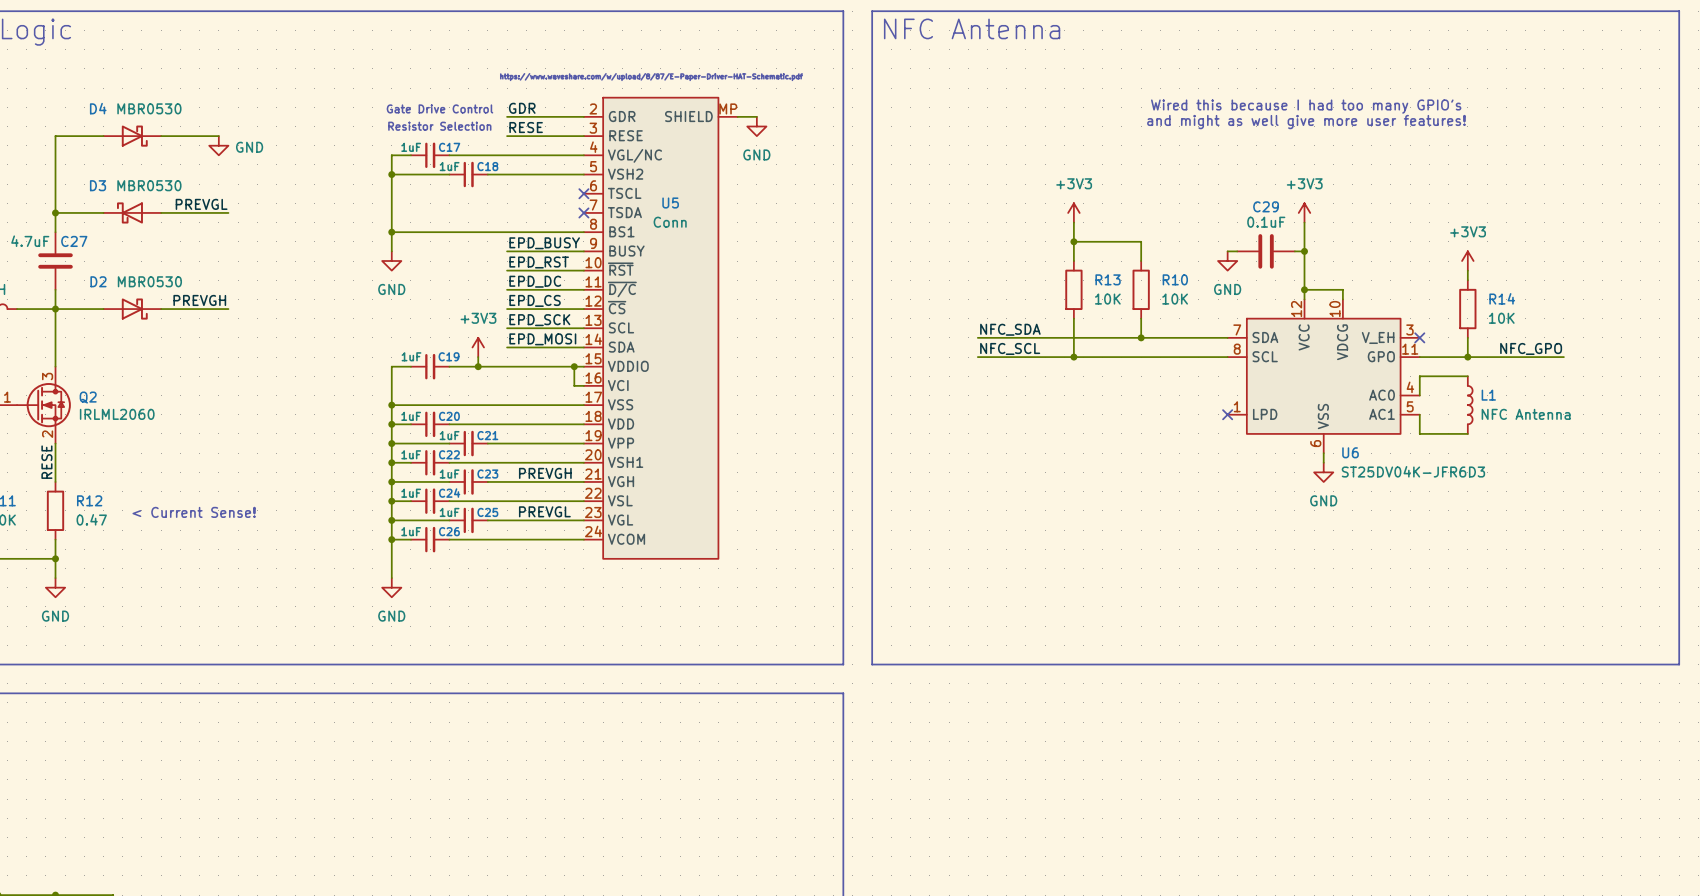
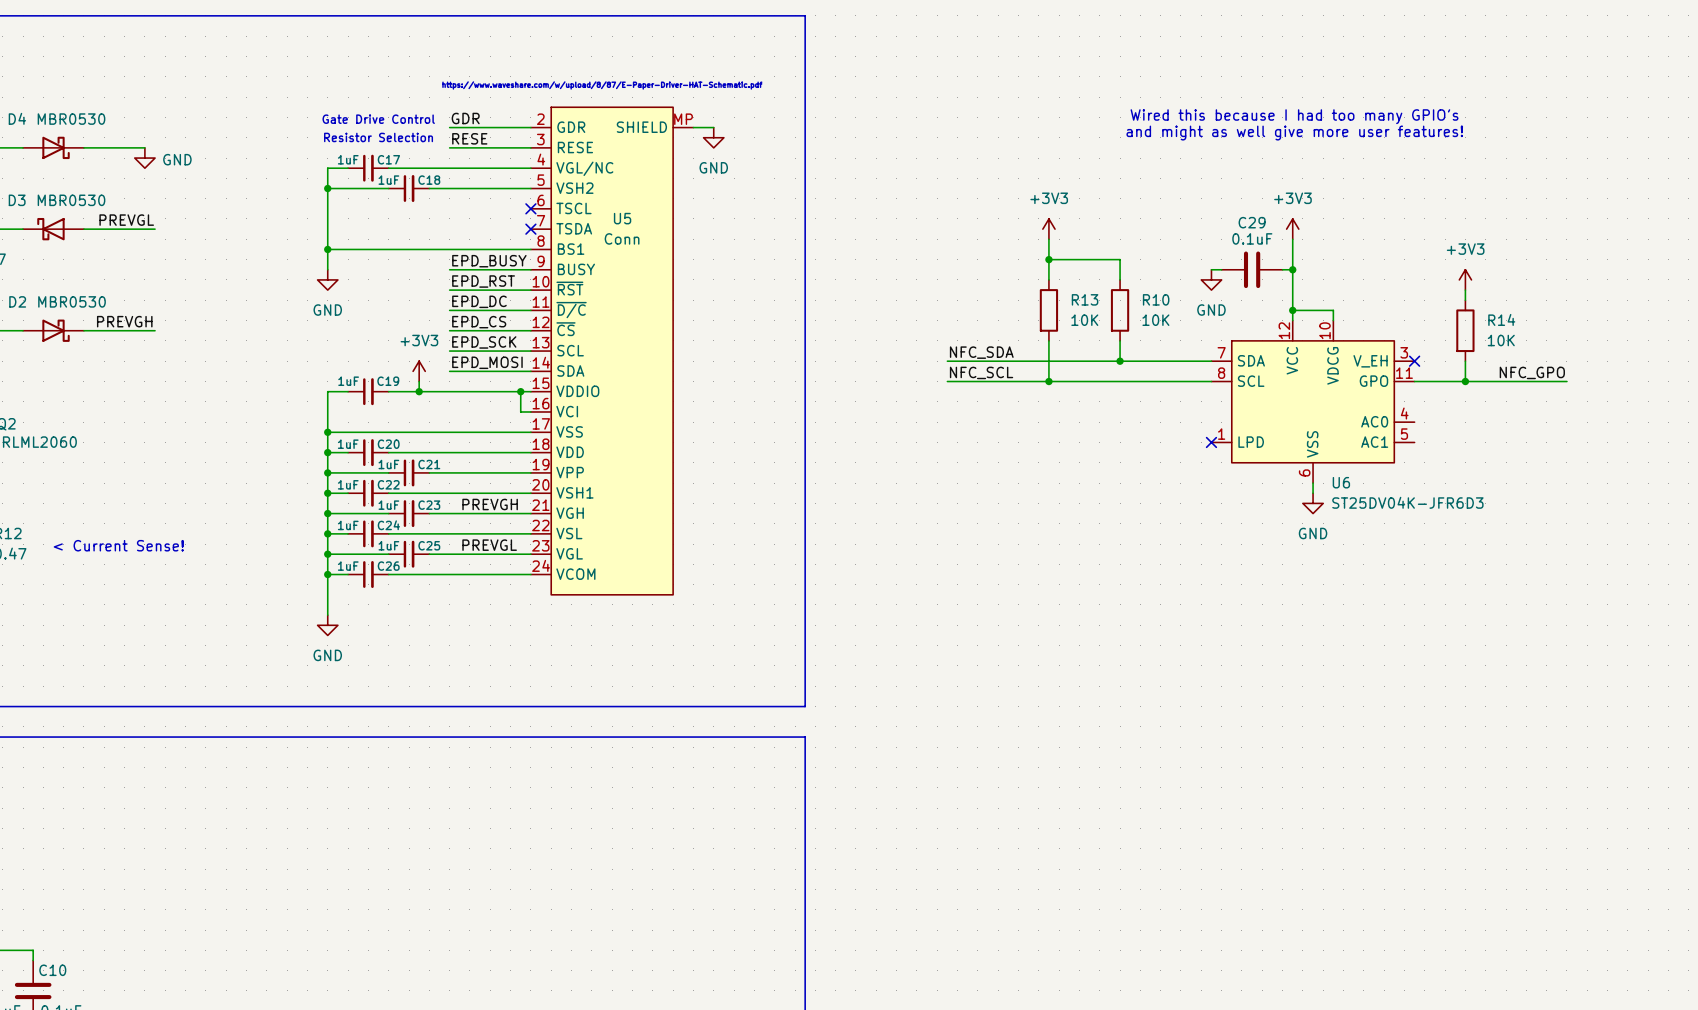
line: (872, 11) (1679, 11) (1679, 664) (872, 664) (872, 11) -> none
text: NFC Antenna (972, 28) -> none
wire: (1467, 376) (1419, 376) (1419, 395) -> none
L1: NFC Antenna (1470, 405) -> none
wire: (1419, 414) (1419, 433) (1467, 433) -> none

